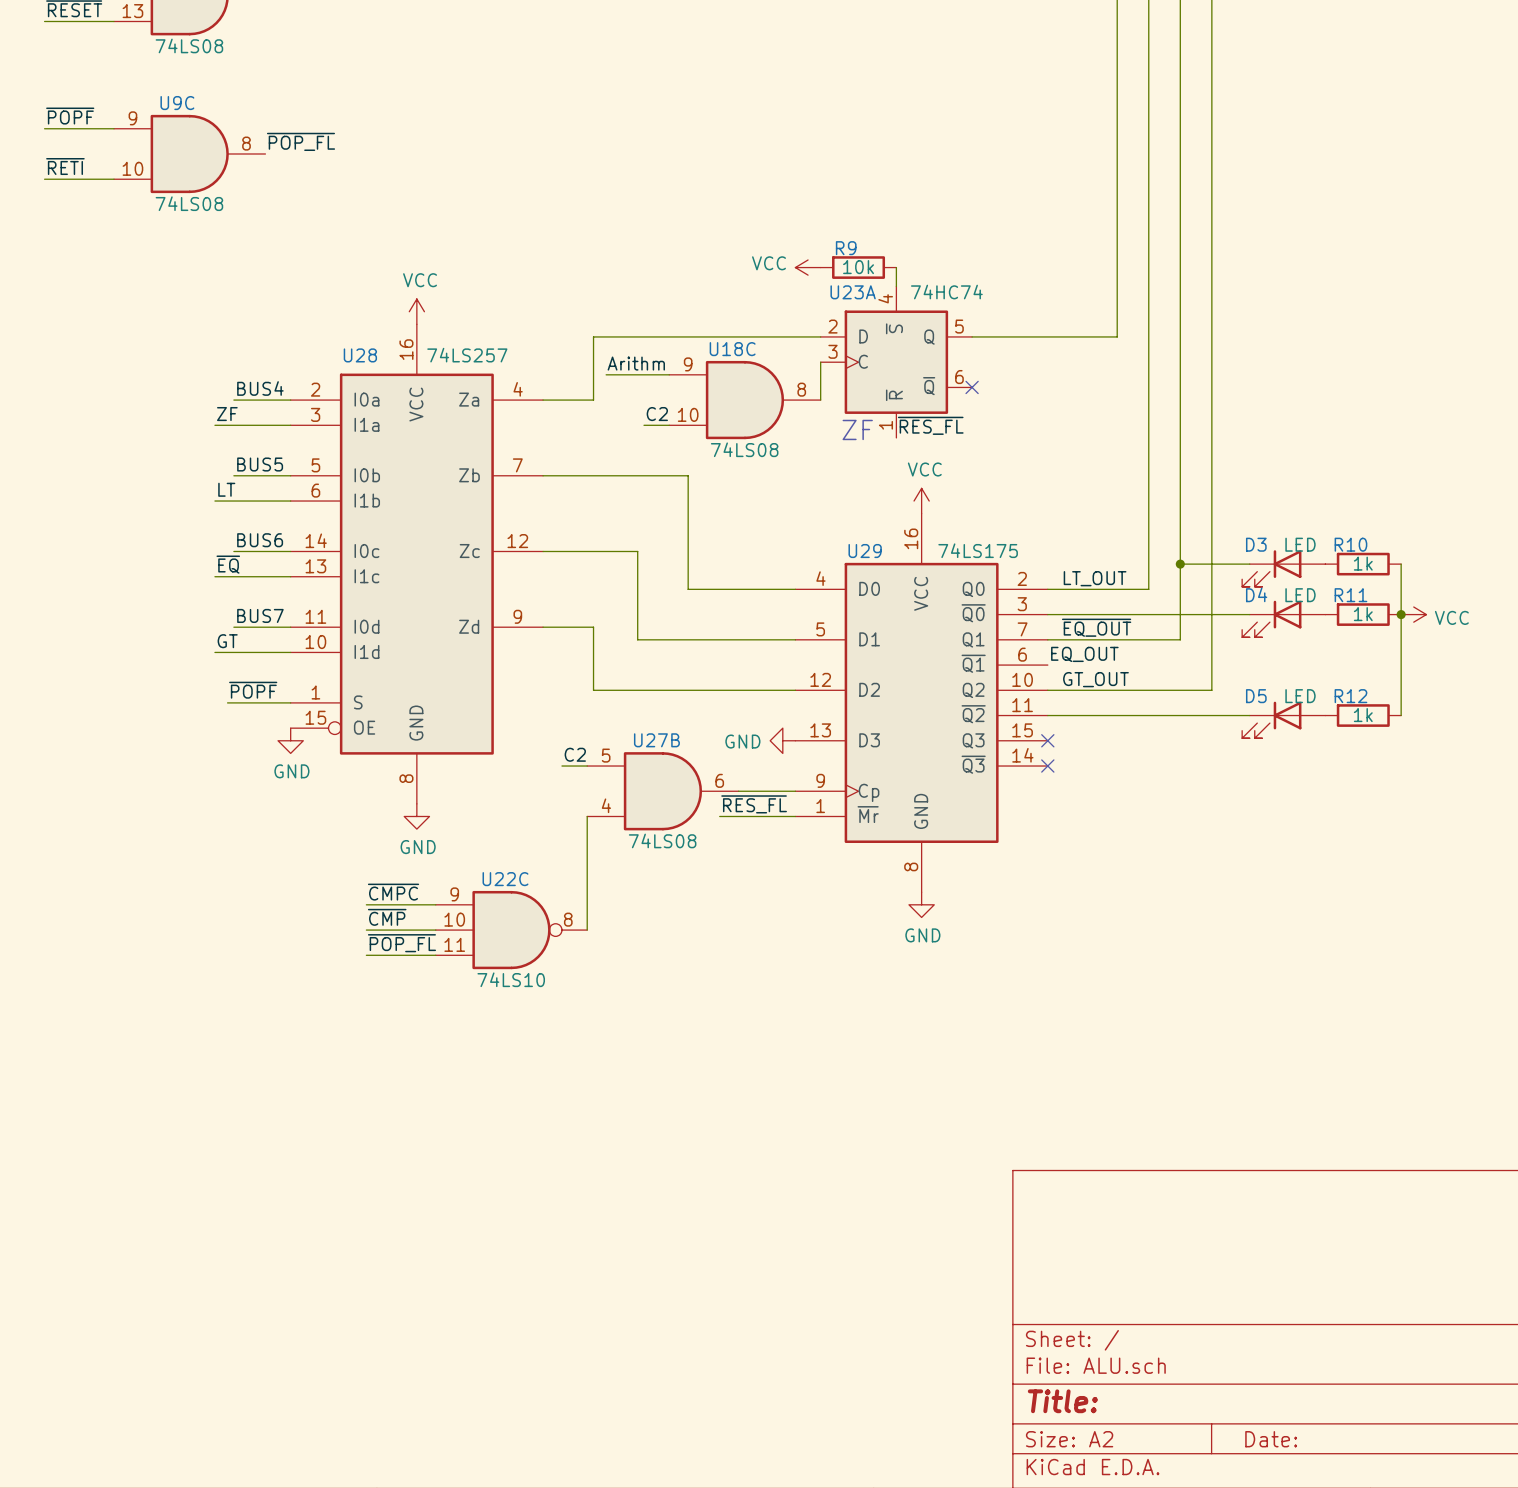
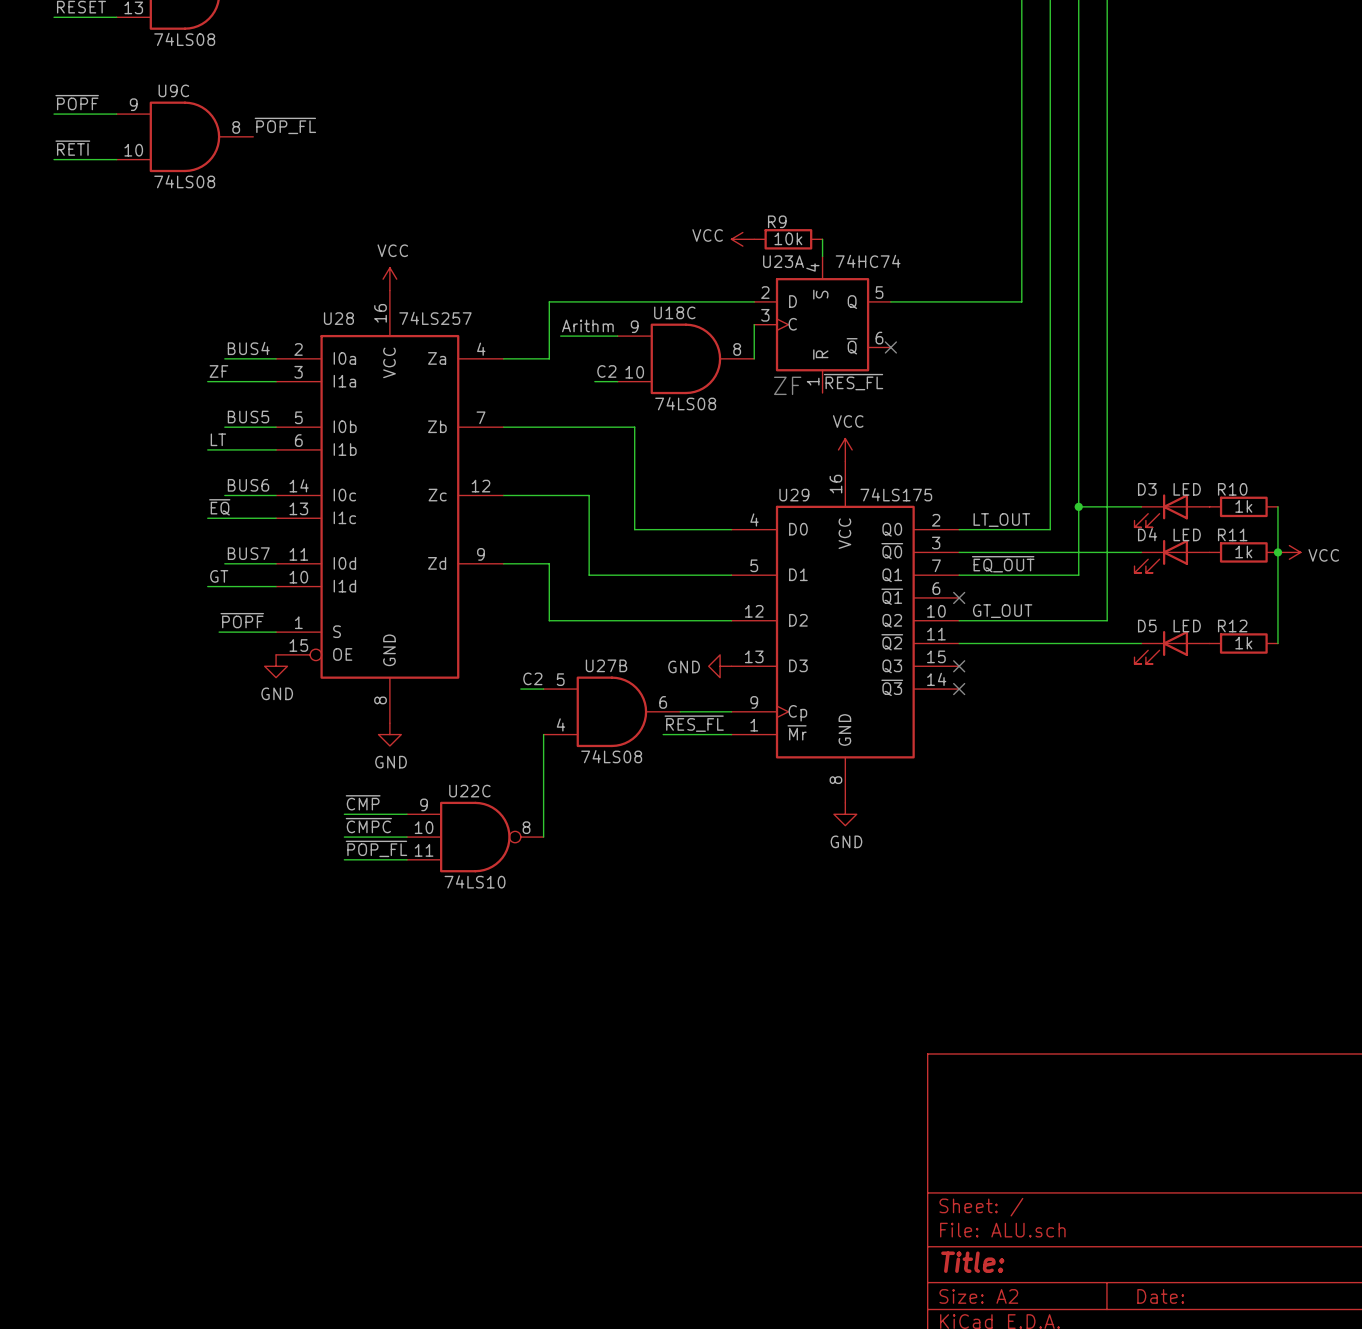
label: EQ_OUT (1084, 654) -> none
no-connect mark: none -> (959, 597)
label: ~{CMPC} (393, 892) -> ~{CMP} (363, 802)
label: ~{CMP} (387, 917) -> ~{CMPC} (368, 825)

